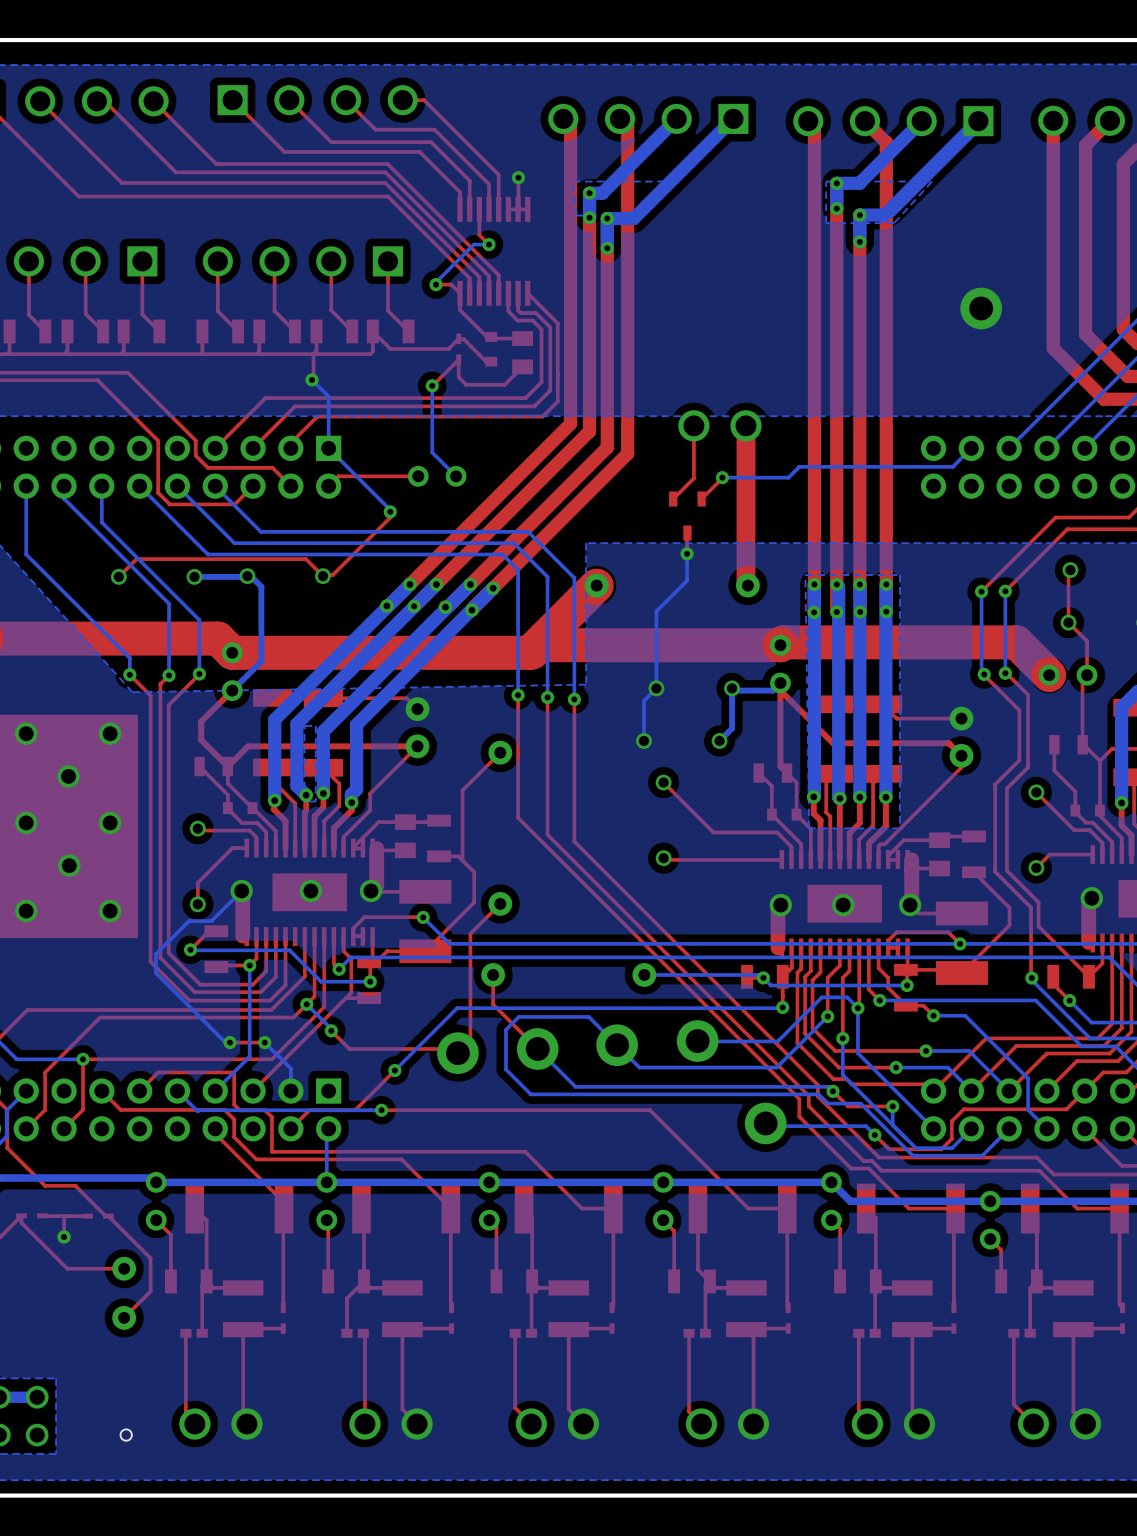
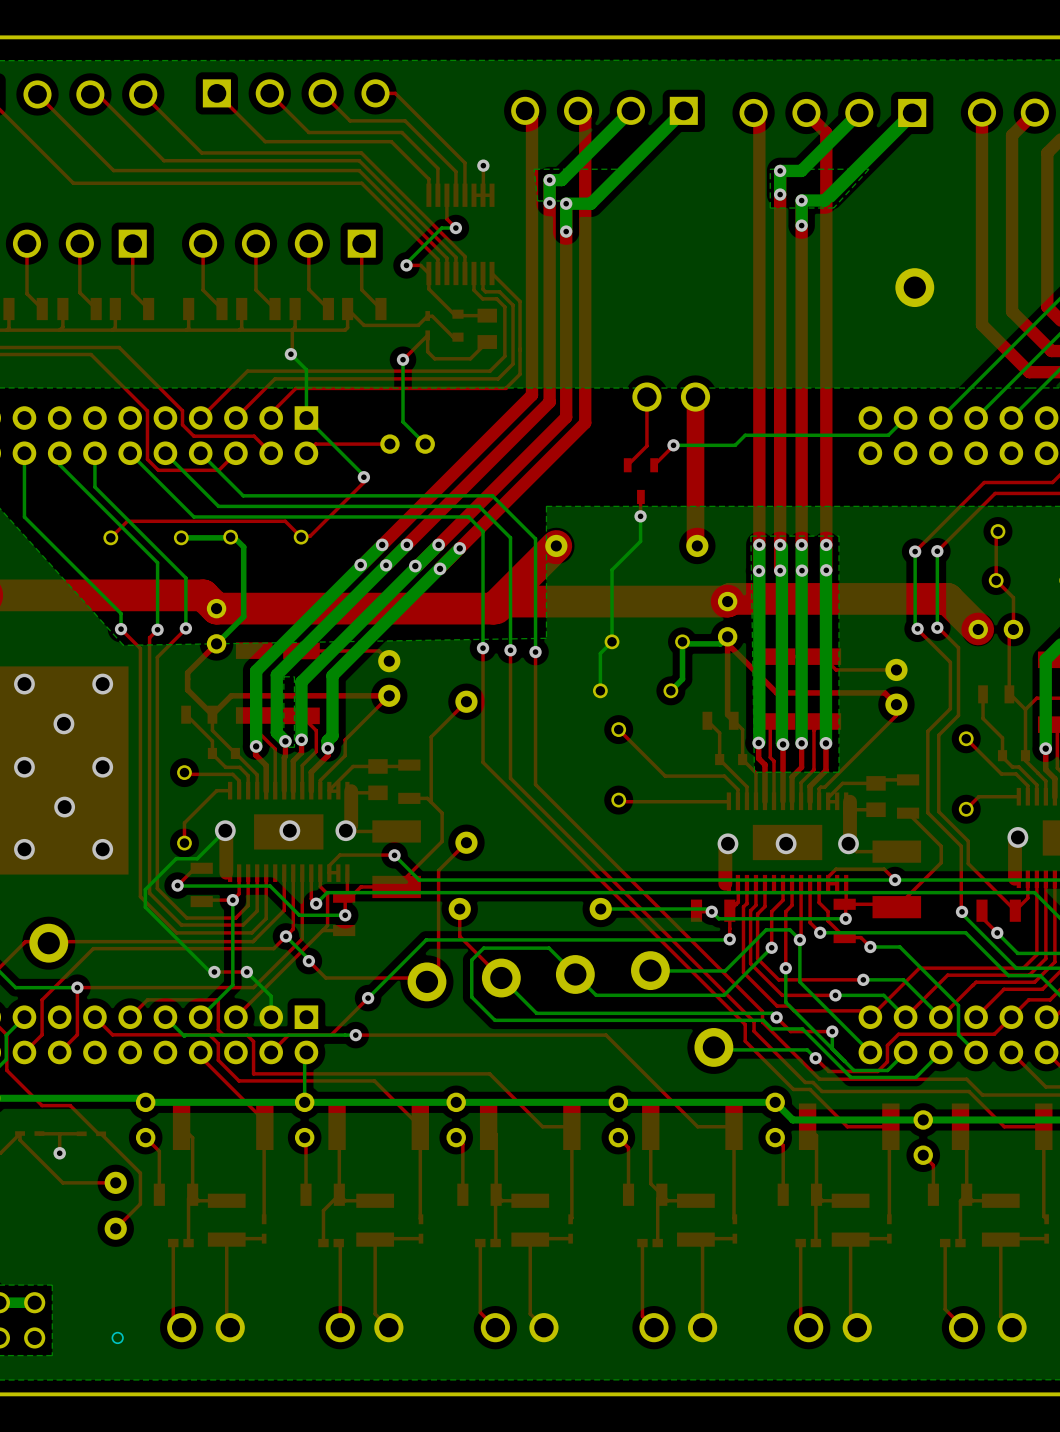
part: none -> (48, 943)

